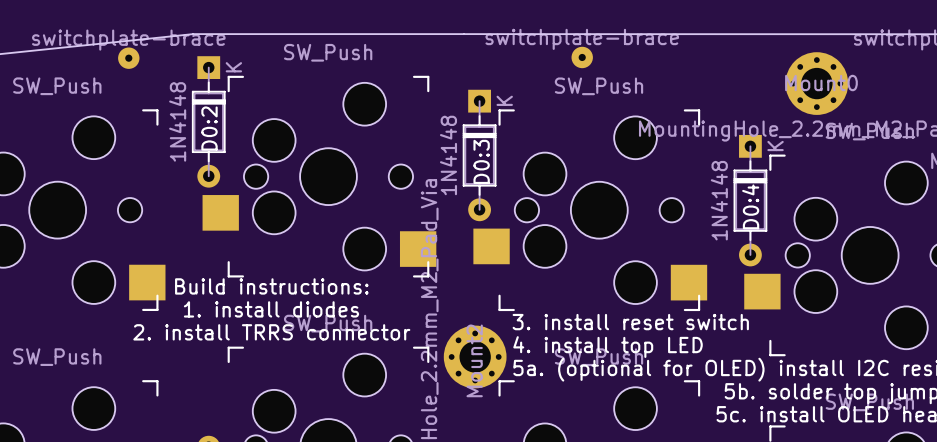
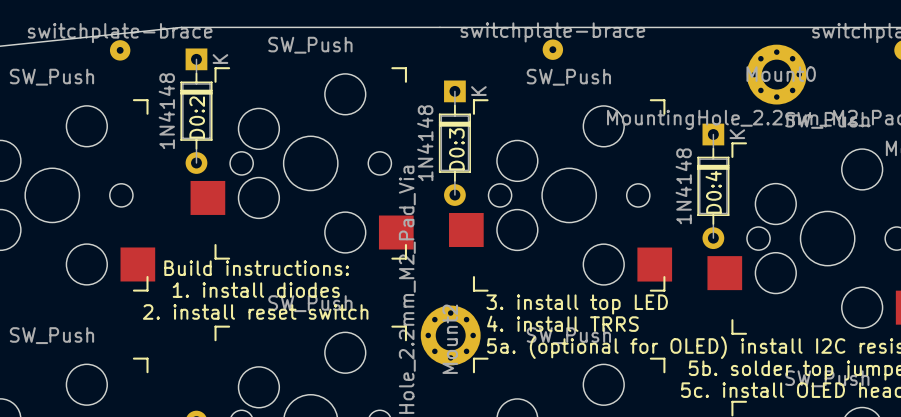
text: 3. install reset switch (630, 322) -> 3. install top LED (577, 304)
text: 2. install TRRS connector (271, 332) -> 2. install reset switch (255, 311)
text: 4. install top LED (608, 347) -> 4. install TRRS (562, 323)

